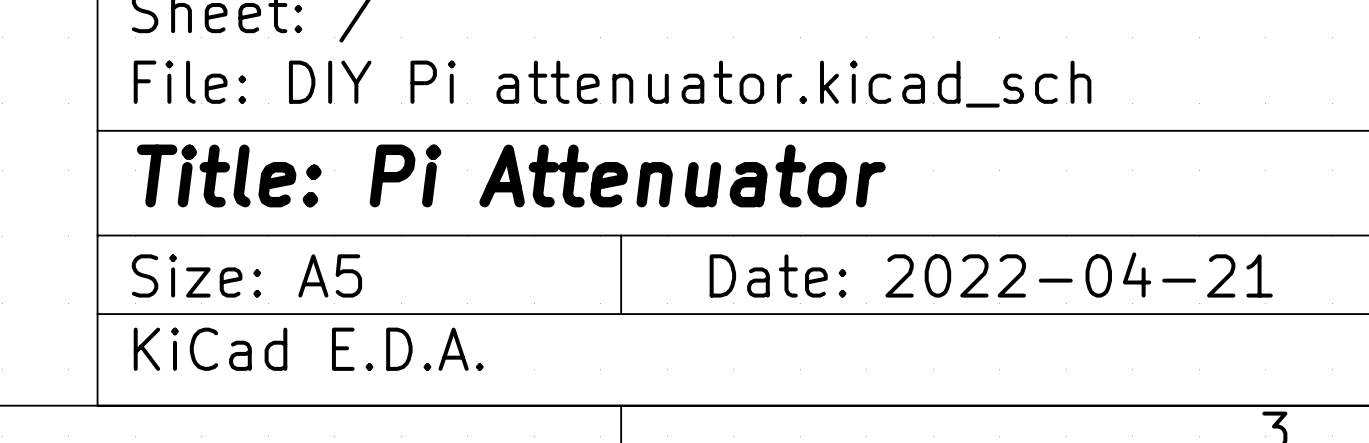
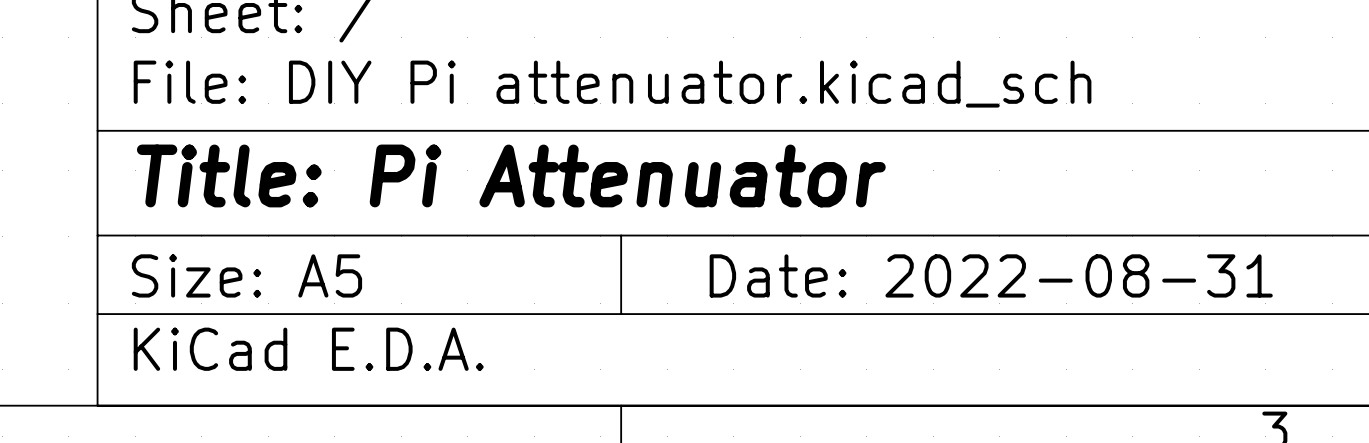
title block: Date: 2022-04-21 (991, 275) -> Date: 2022-08-31 (991, 275)

